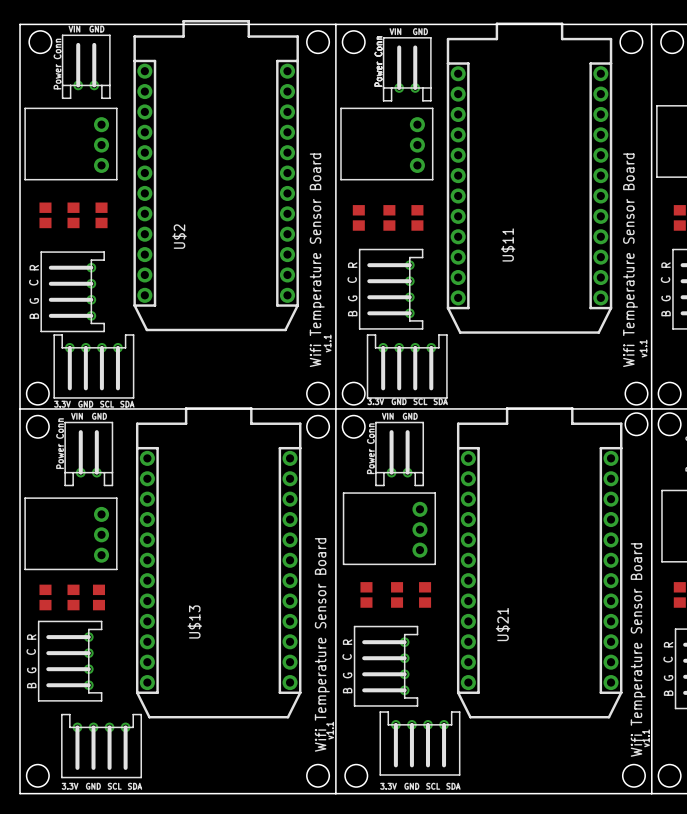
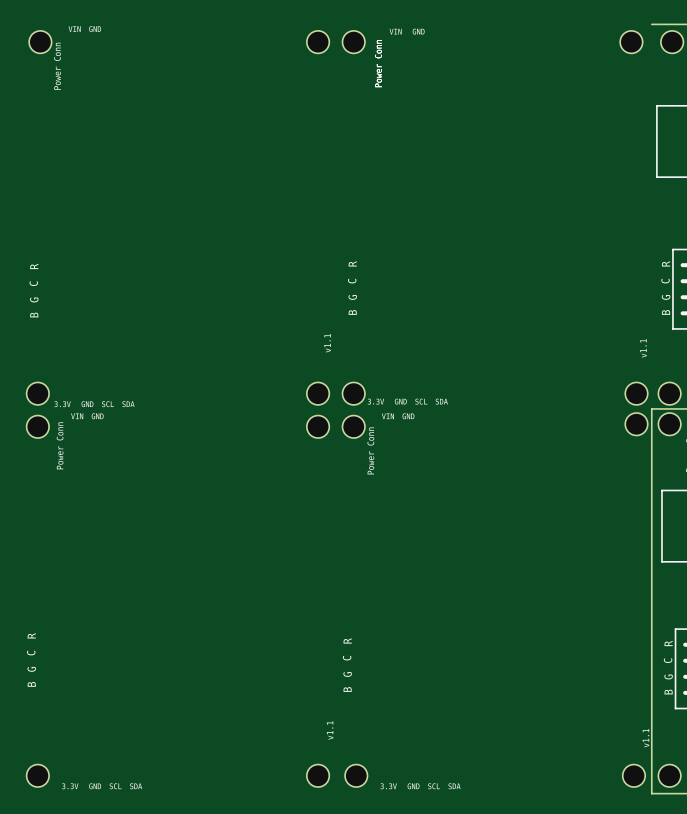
board edge: (335, 24) (20, 24) (20, 408) (335, 408) -> none
board edge: (335, 24) (651, 24) (651, 408) (335, 408) (335, 24) -> none
part: (86, 66) -> none
part: (407, 69) -> none
part: (70, 144) -> none
part: (386, 144) -> none
U$2: (216, 175) -> none
U$11: (529, 178) -> none
part: (45, 215) -> none
part: (73, 215) -> none
part: (101, 215) -> none
part: (358, 217) -> none
part: (389, 217) -> none
part: (417, 217) -> none
part: (679, 217) -> none
text: Wifi Temperature Sensor Board (317, 260) -> none
text: Wifi Temperature Sensor Board (630, 260) -> none
part: (391, 289) -> none
part: (72, 291) -> none
part: (93, 366) -> none
part: (407, 366) -> none
board edge: (20, 409) (20, 793) (335, 793) -> none
board edge: (335, 409) (335, 793) (651, 793) -> none
part: (88, 453) -> none
part: (399, 453) -> none
part: (389, 528) -> none
part: (70, 533) -> none
U$13: (218, 562) -> none
U$21: (539, 562) -> none
part: (366, 594) -> none
part: (397, 594) -> none
part: (425, 594) -> none
part: (679, 594) -> none
part: (45, 597) -> none
part: (73, 597) -> none
part: (98, 597) -> none
text: Wifi Temperature Sensor Board (322, 644) -> none
text: Wifi Temperature Sensor Board (638, 650) -> none
part: (70, 661) -> none
part: (386, 666) -> none
part: (419, 743) -> none
part: (101, 746) -> none

